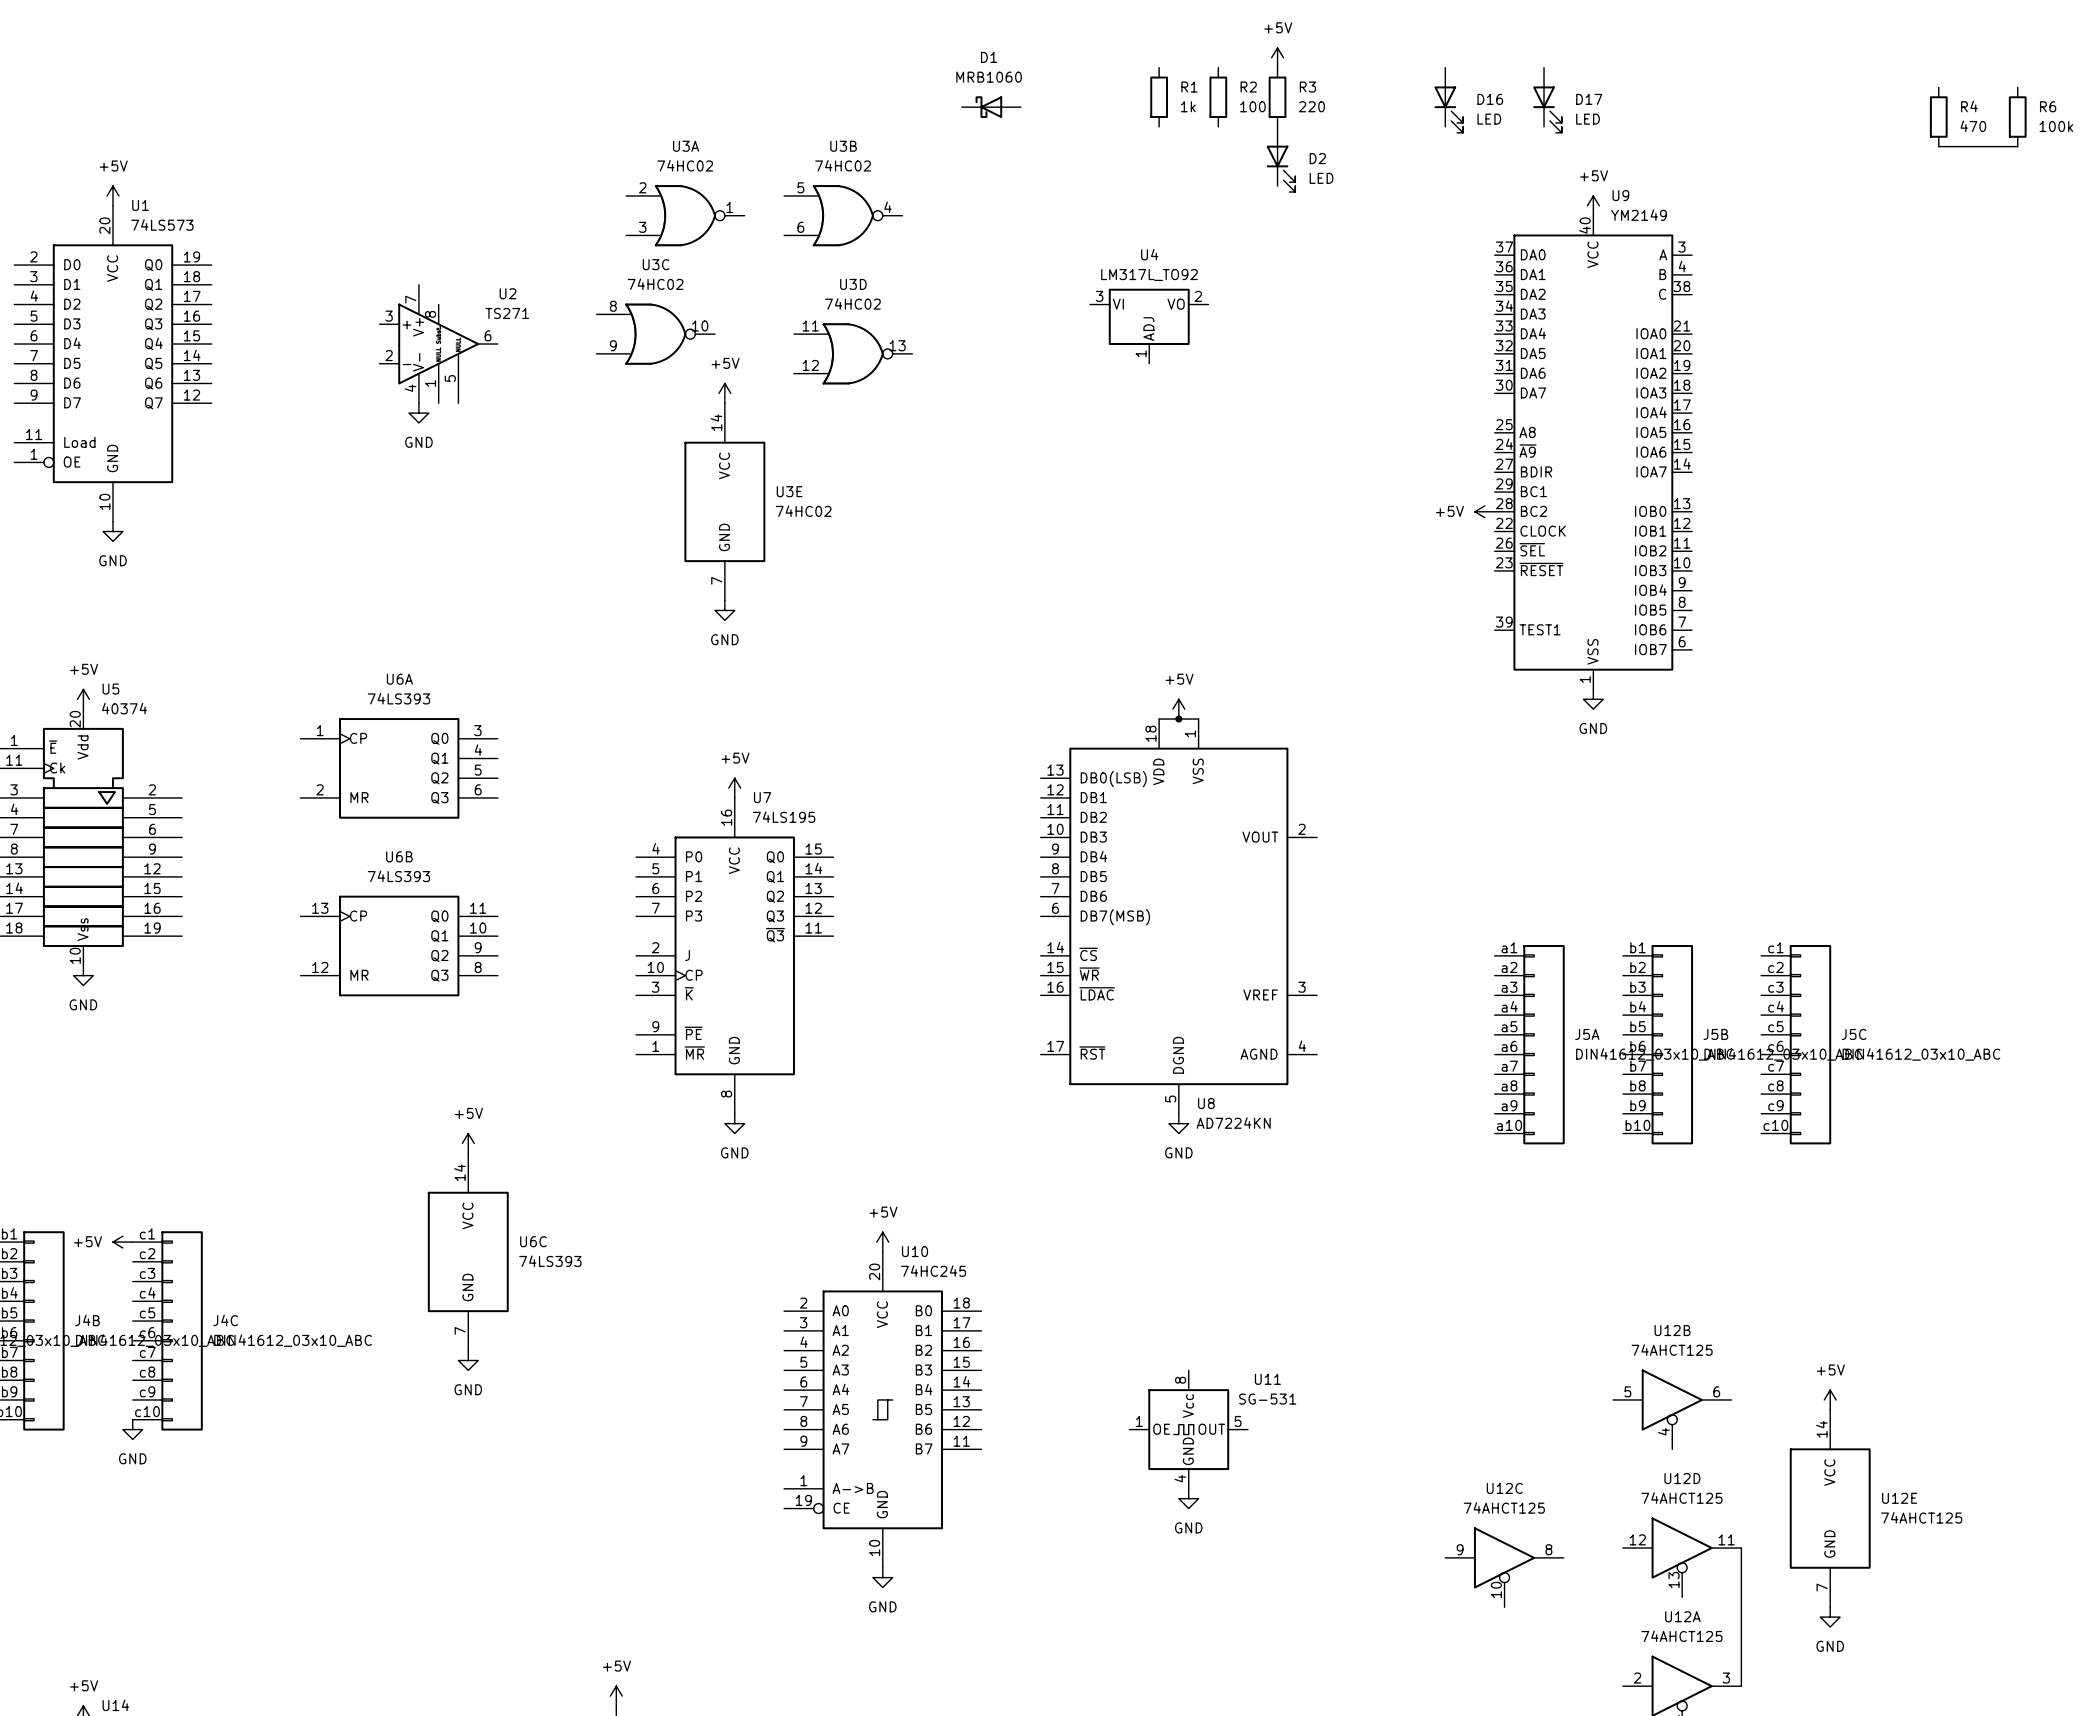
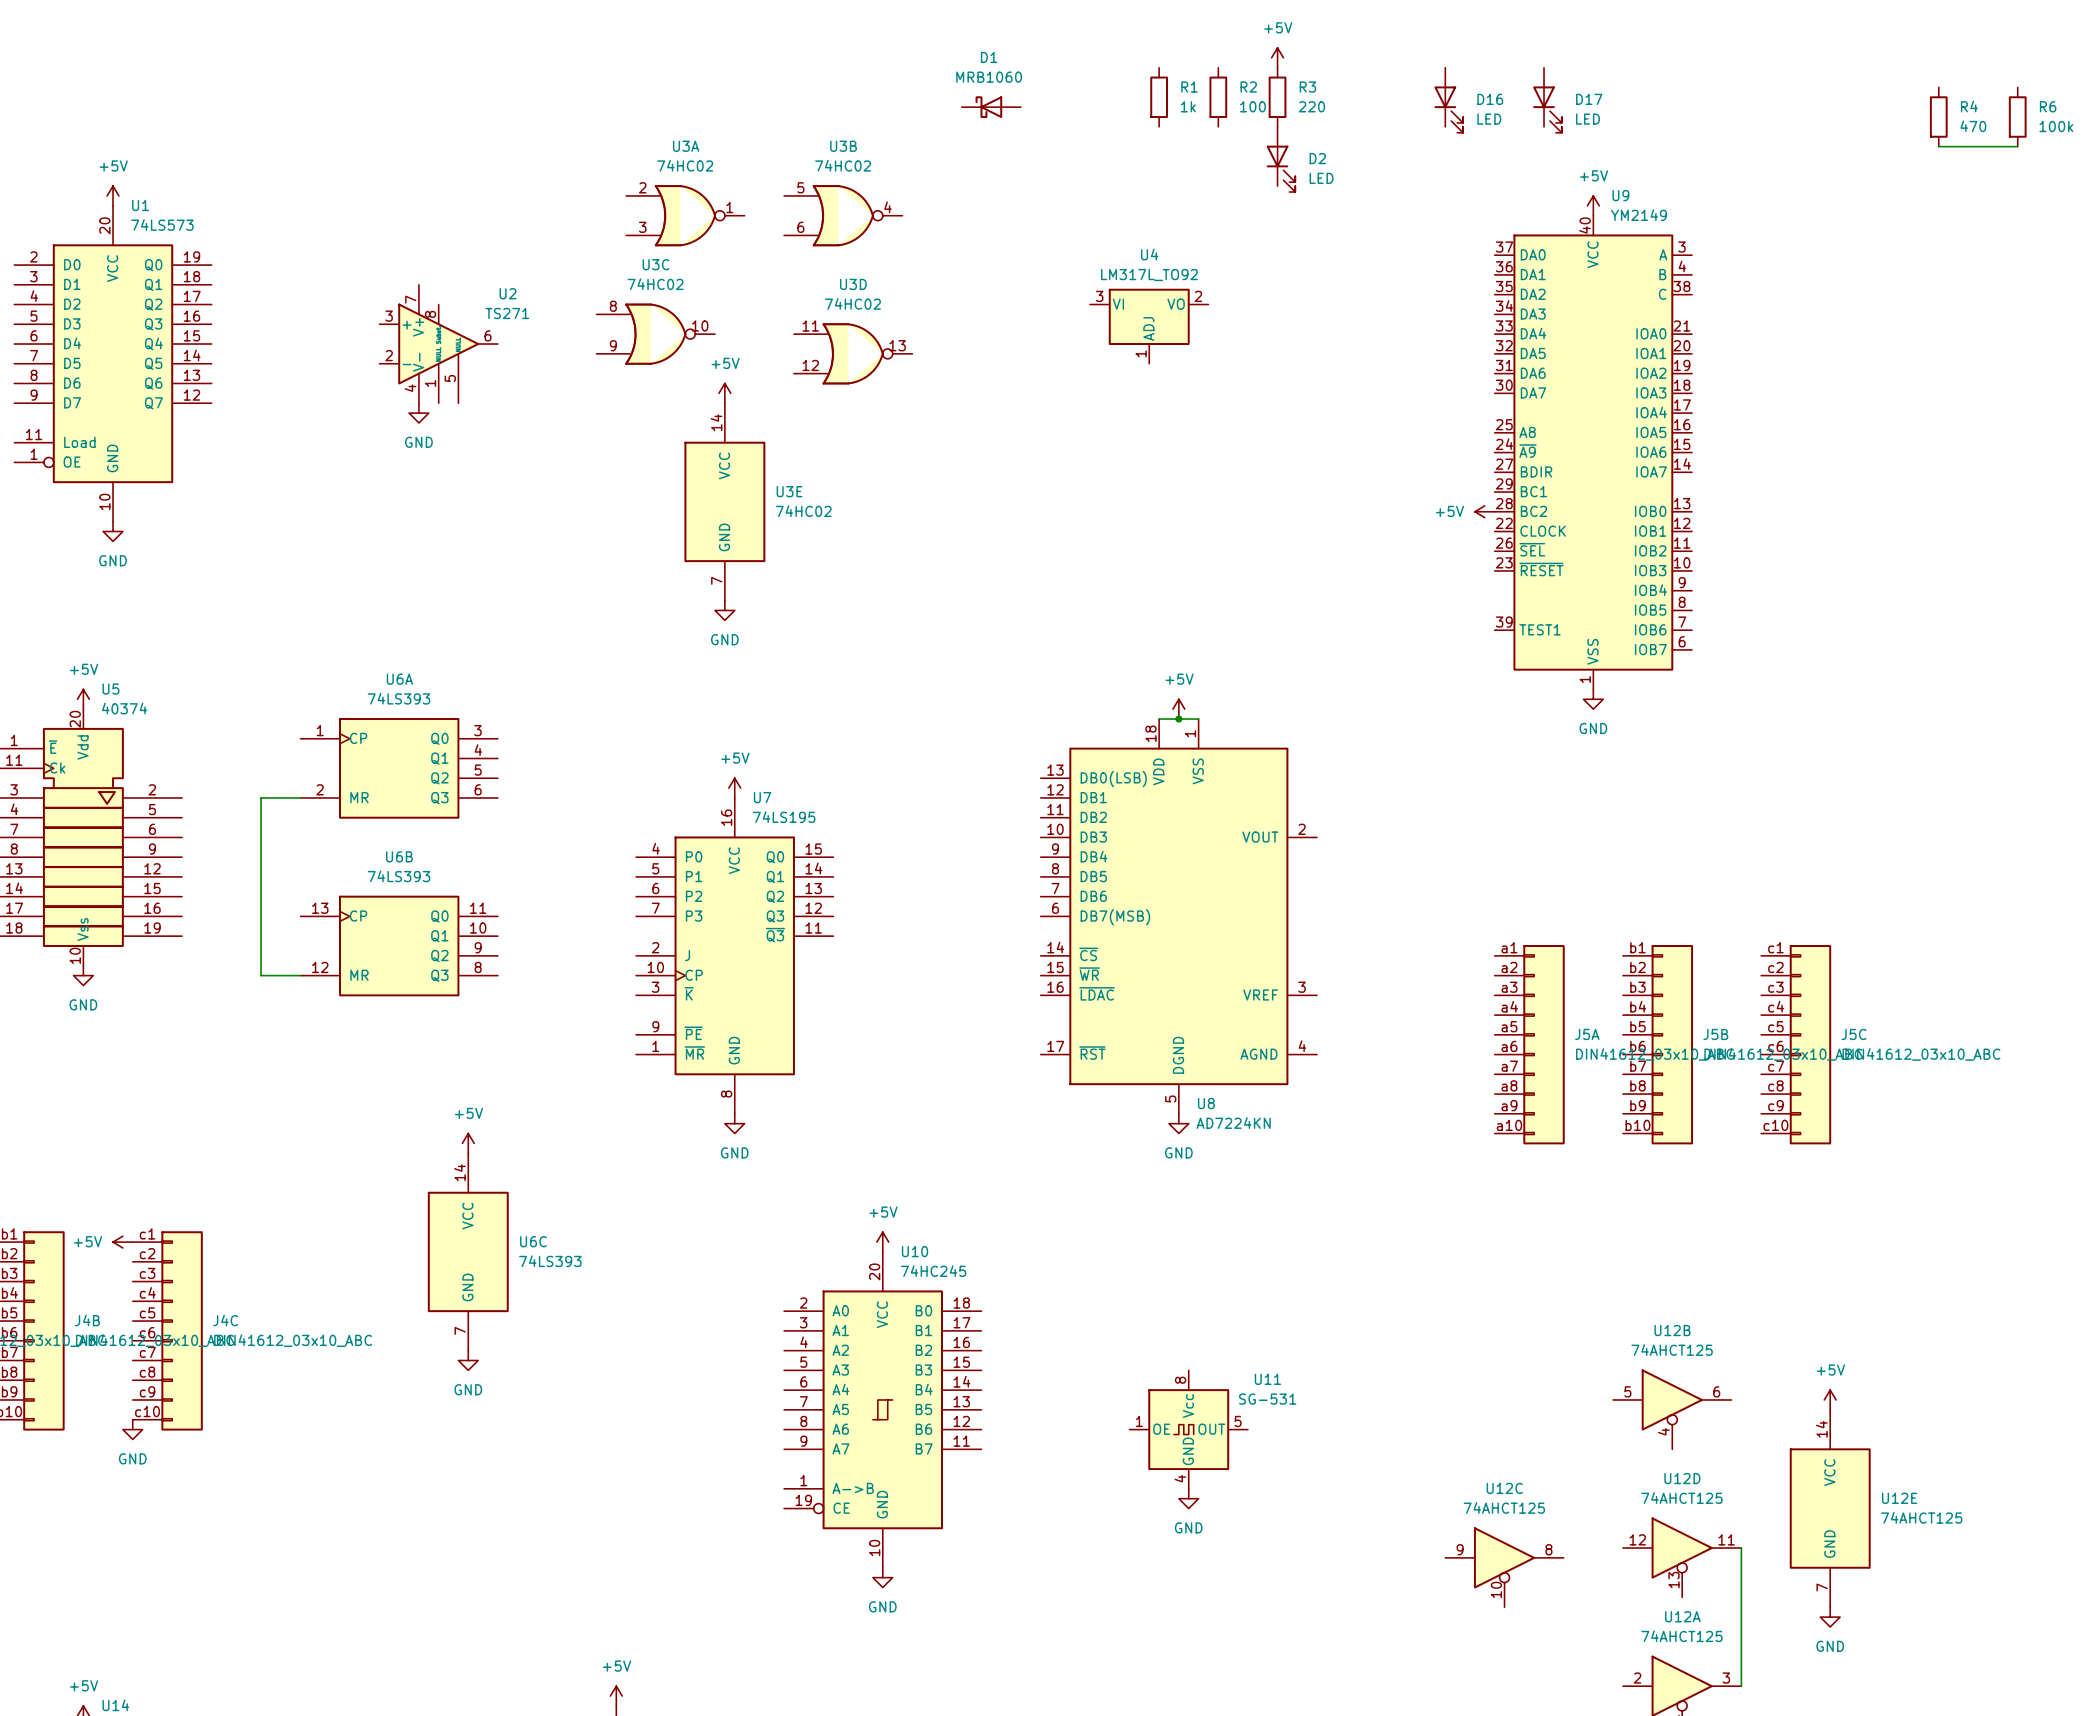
wire: none -> (300, 797) (261, 797) (261, 975) (300, 975)

